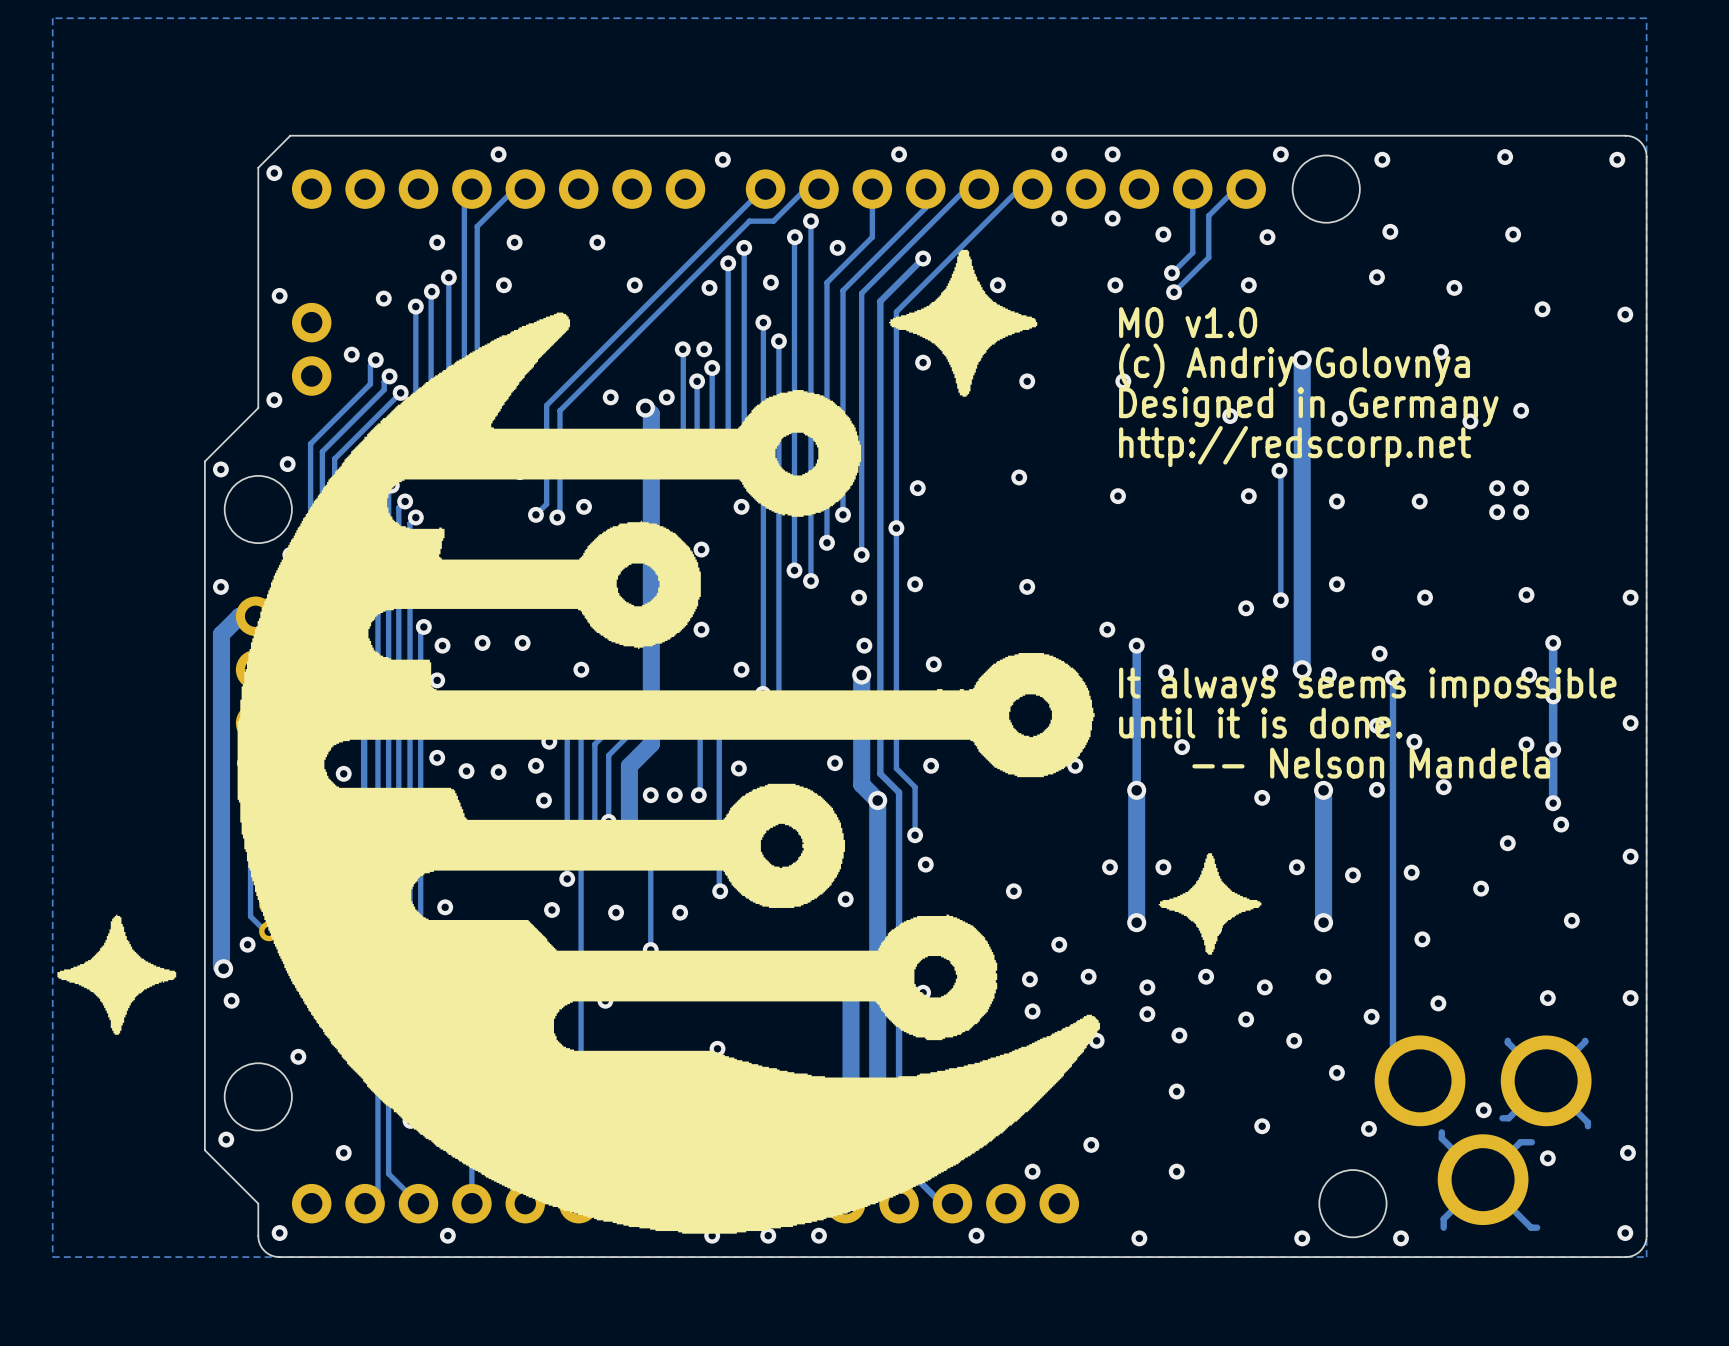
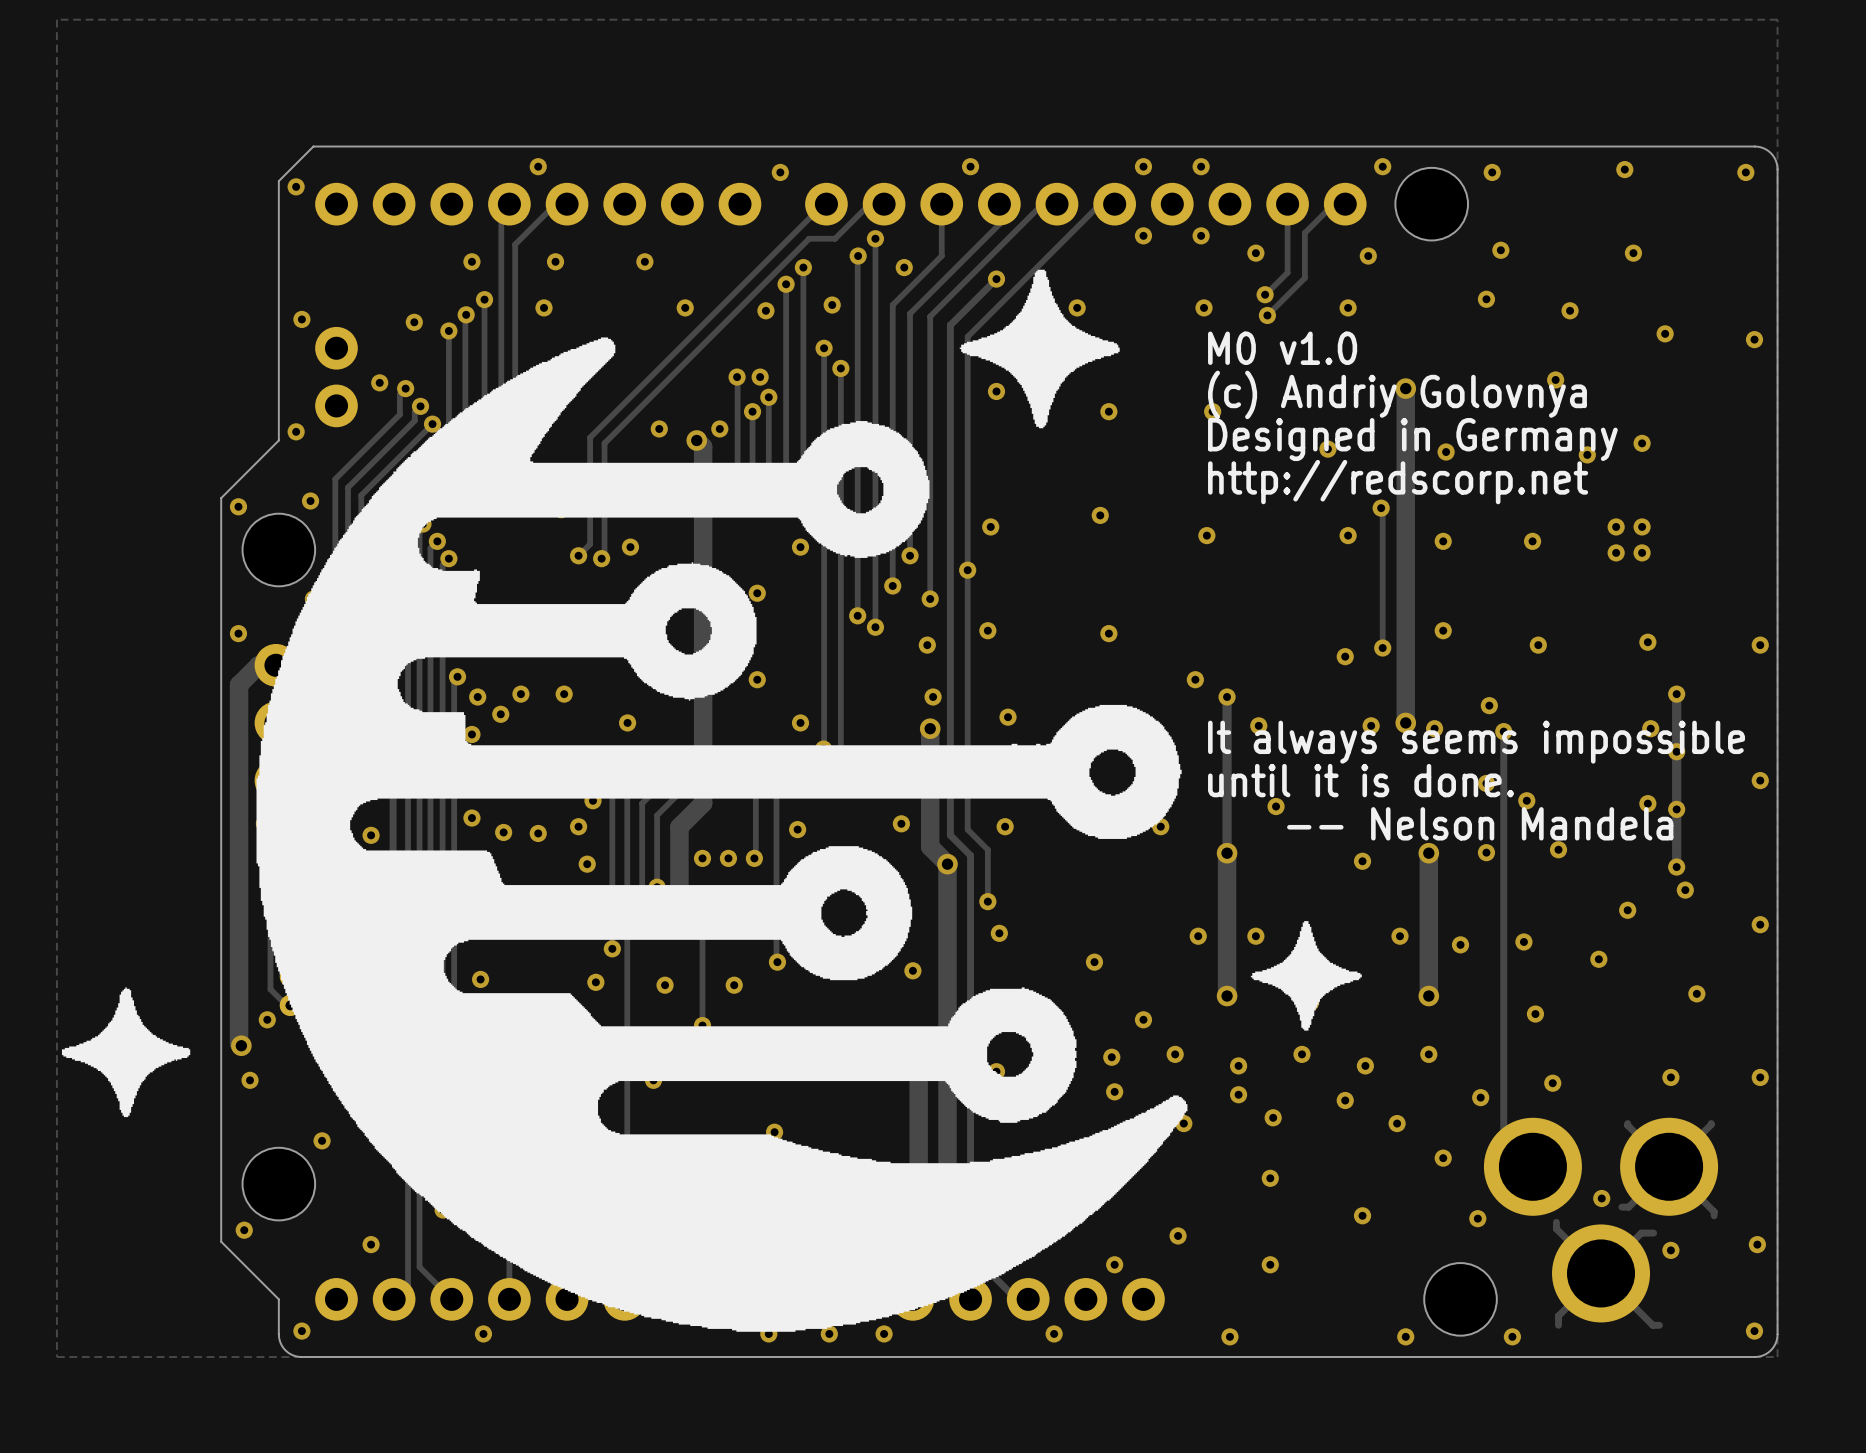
via: none -> (500, 714)

